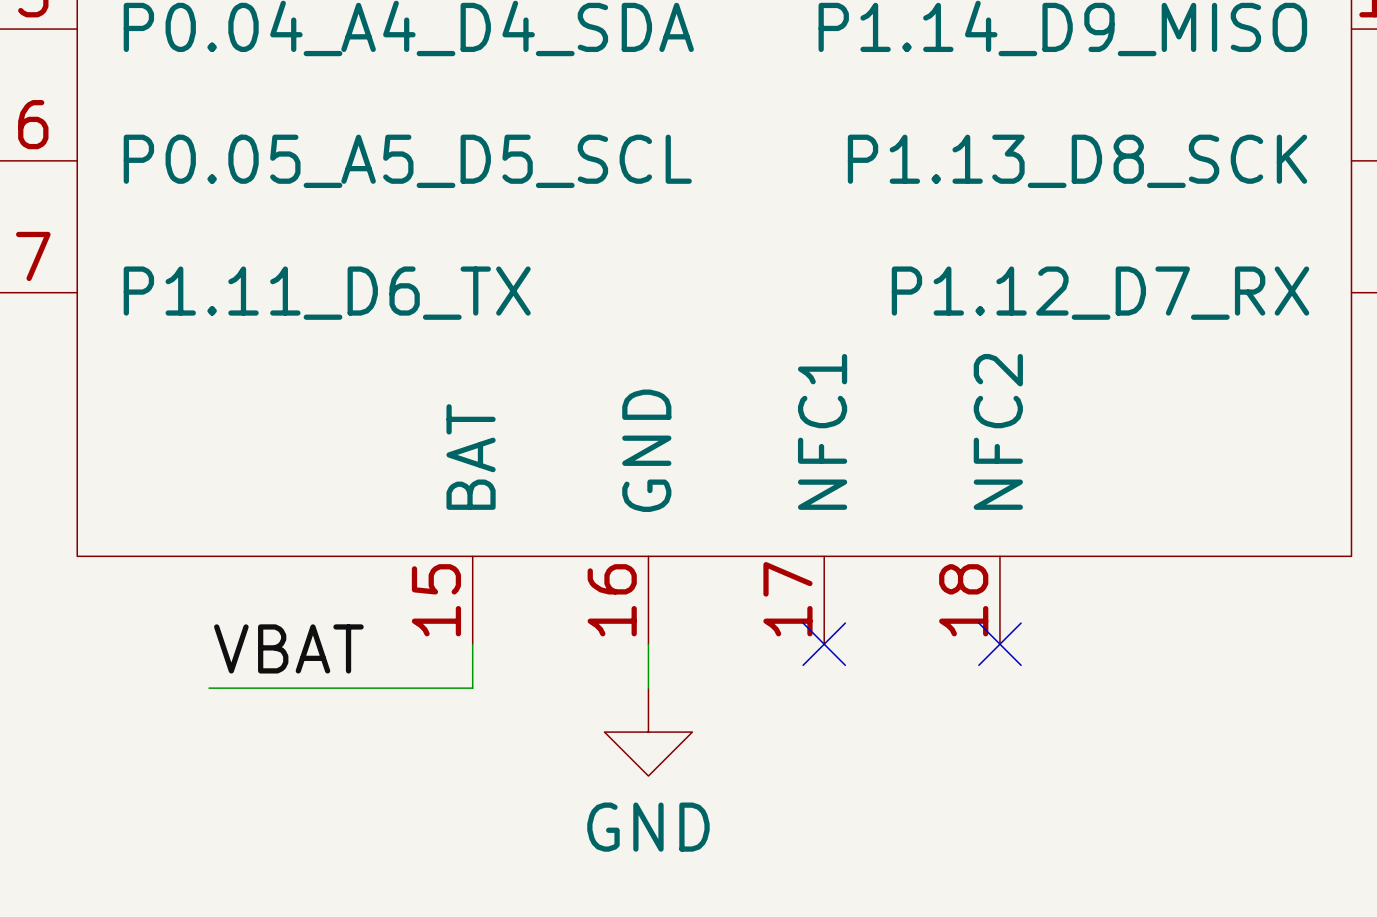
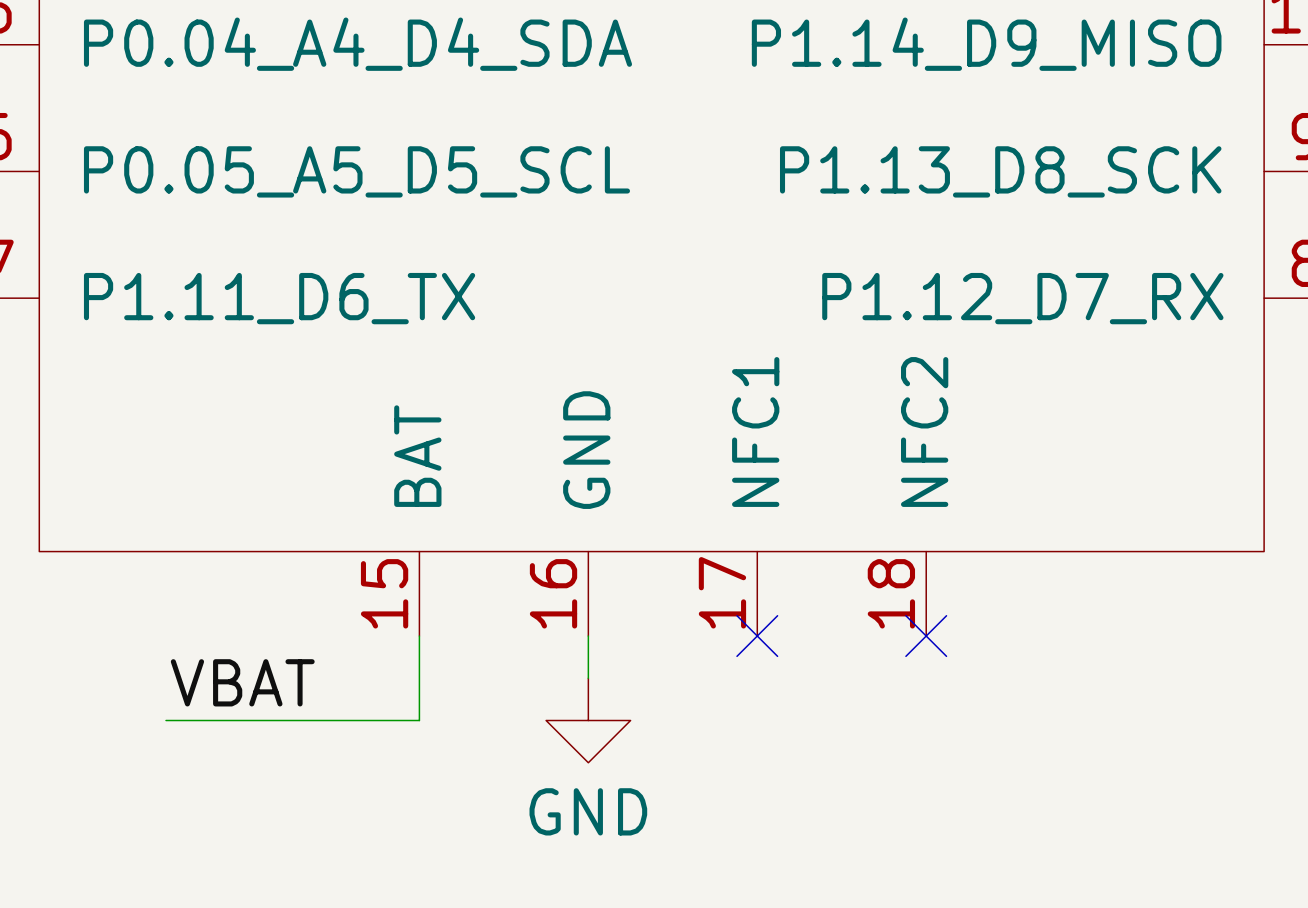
label position: VBAT (288, 648) -> VBAT (242, 682)
wire: (209, 688) (472, 688) -> (166, 720) (419, 720) (419, 678)

